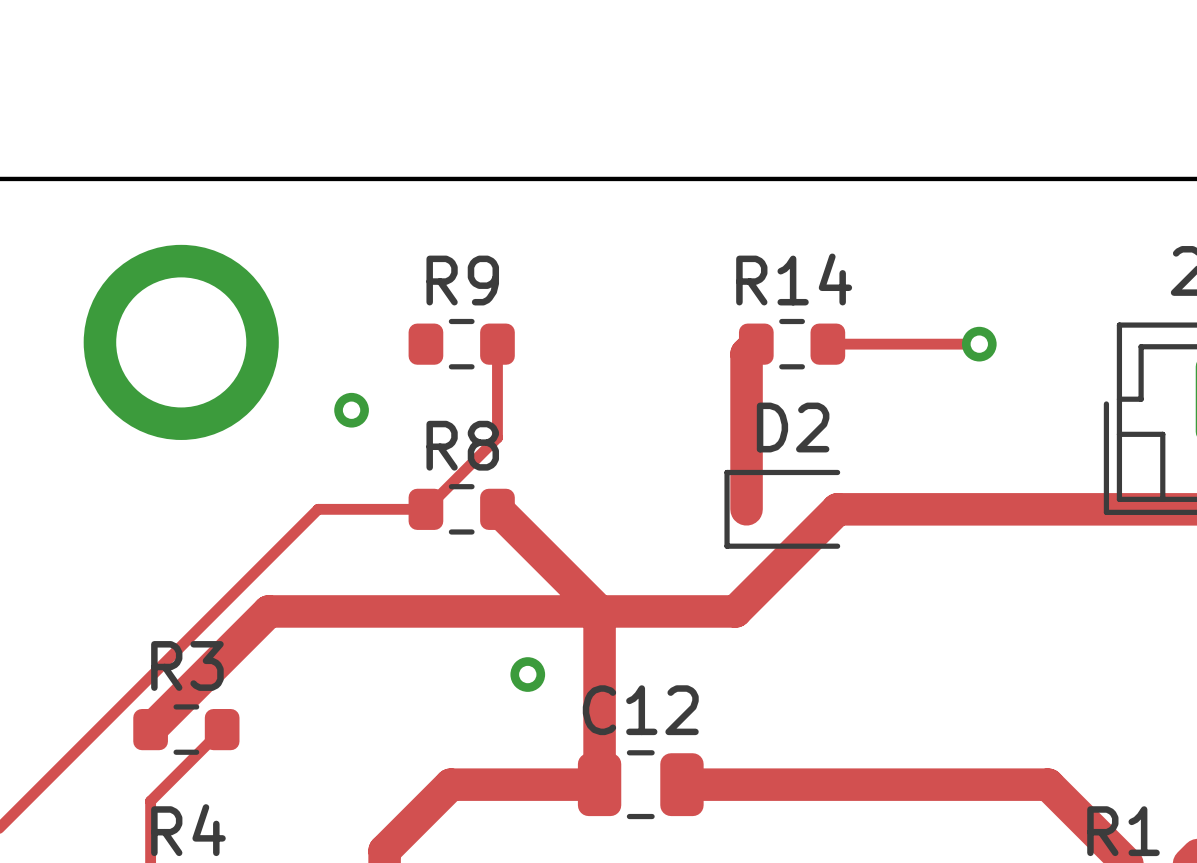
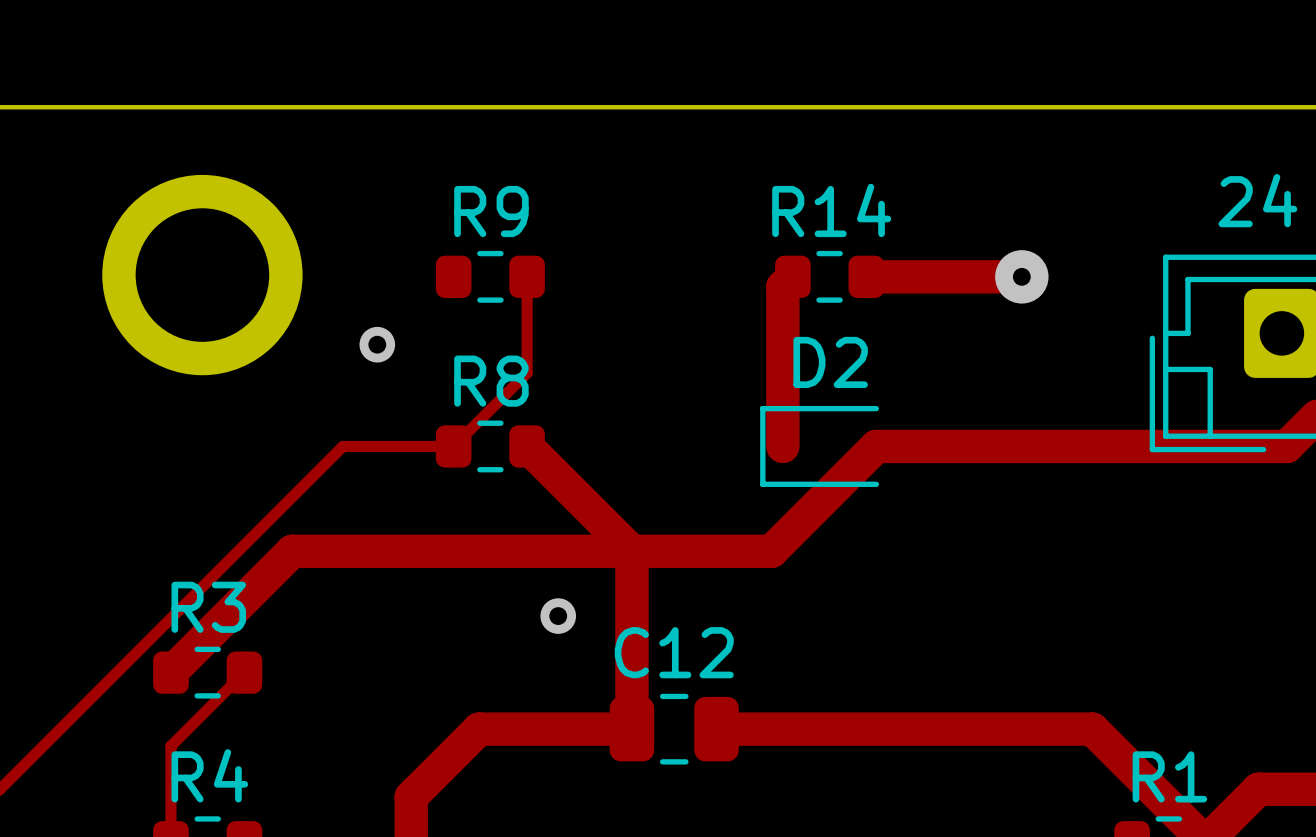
via size: [961, 326, 997, 362] -> [995, 250, 1049, 304]
track width: thin (827, 344) (979, 344) -> thick (866, 276) (1021, 276)

